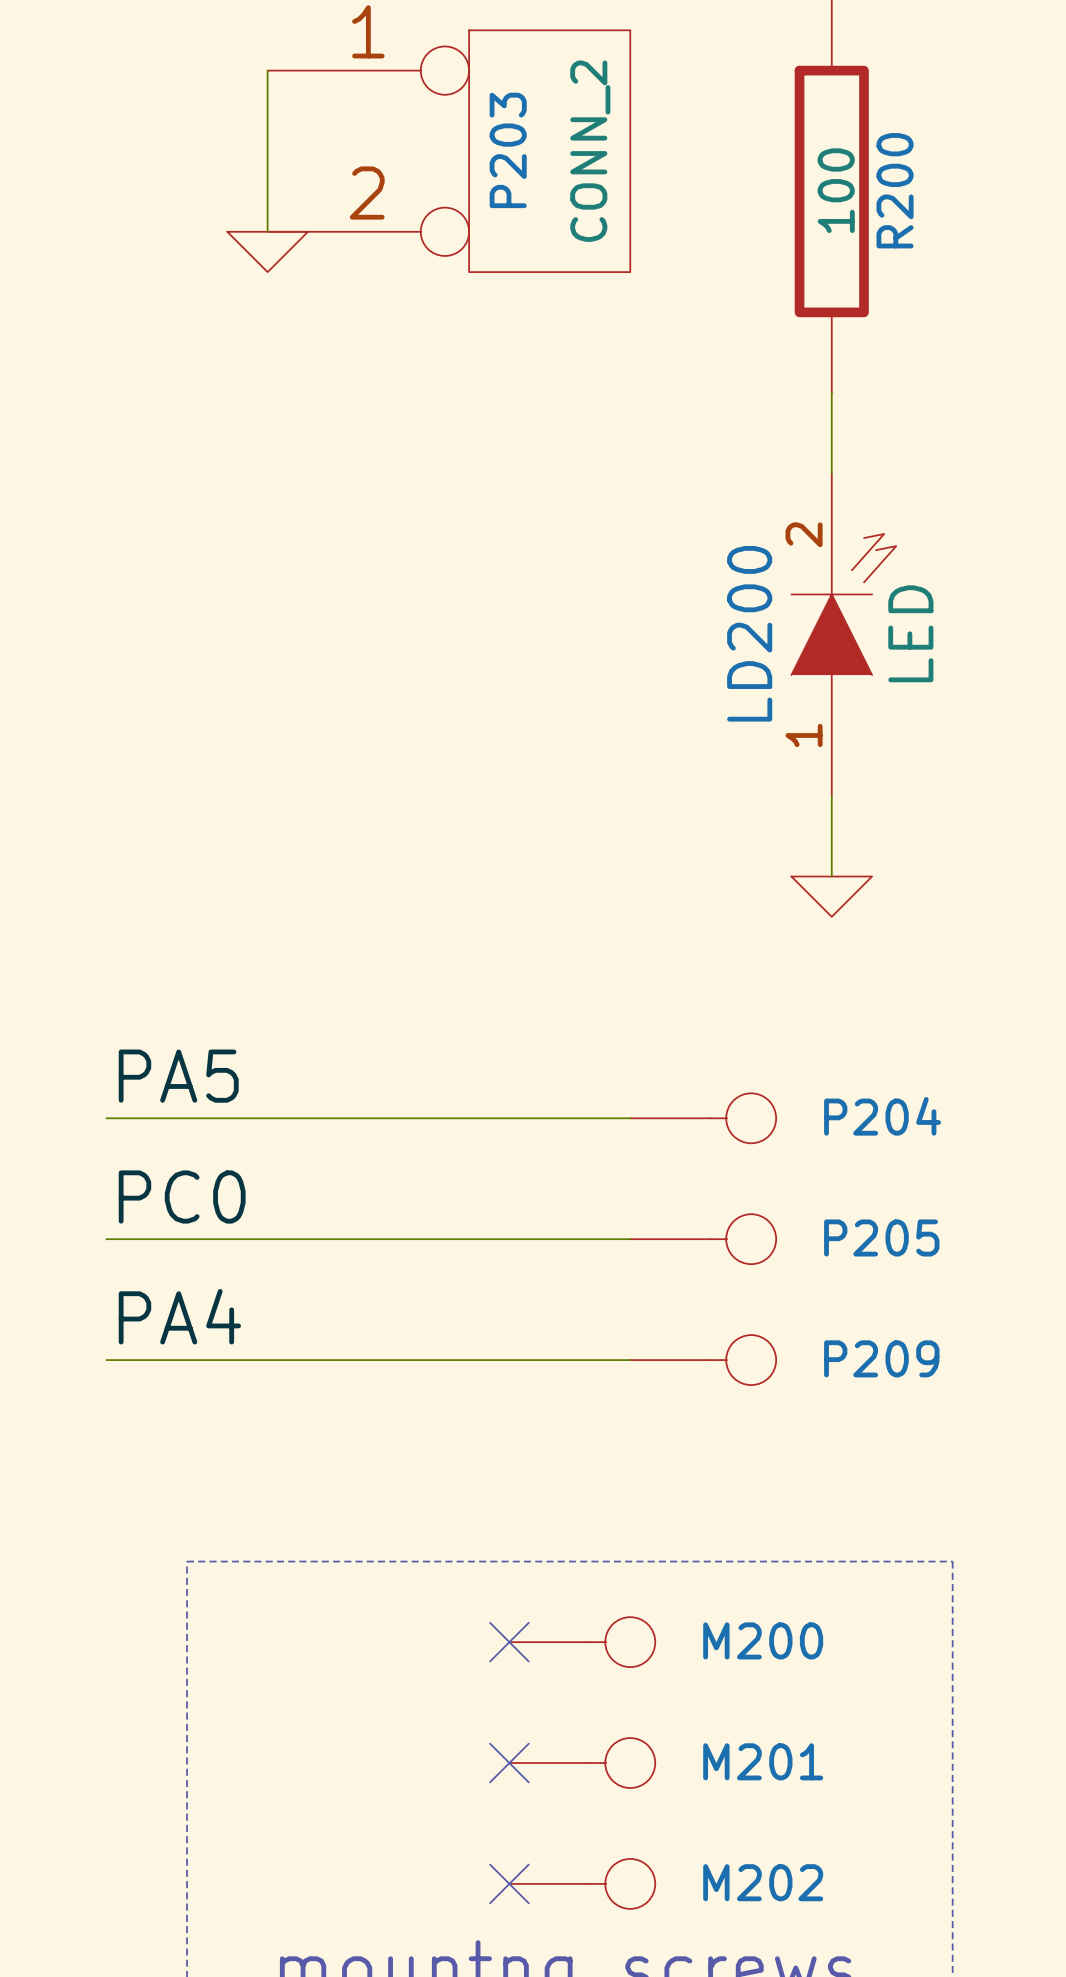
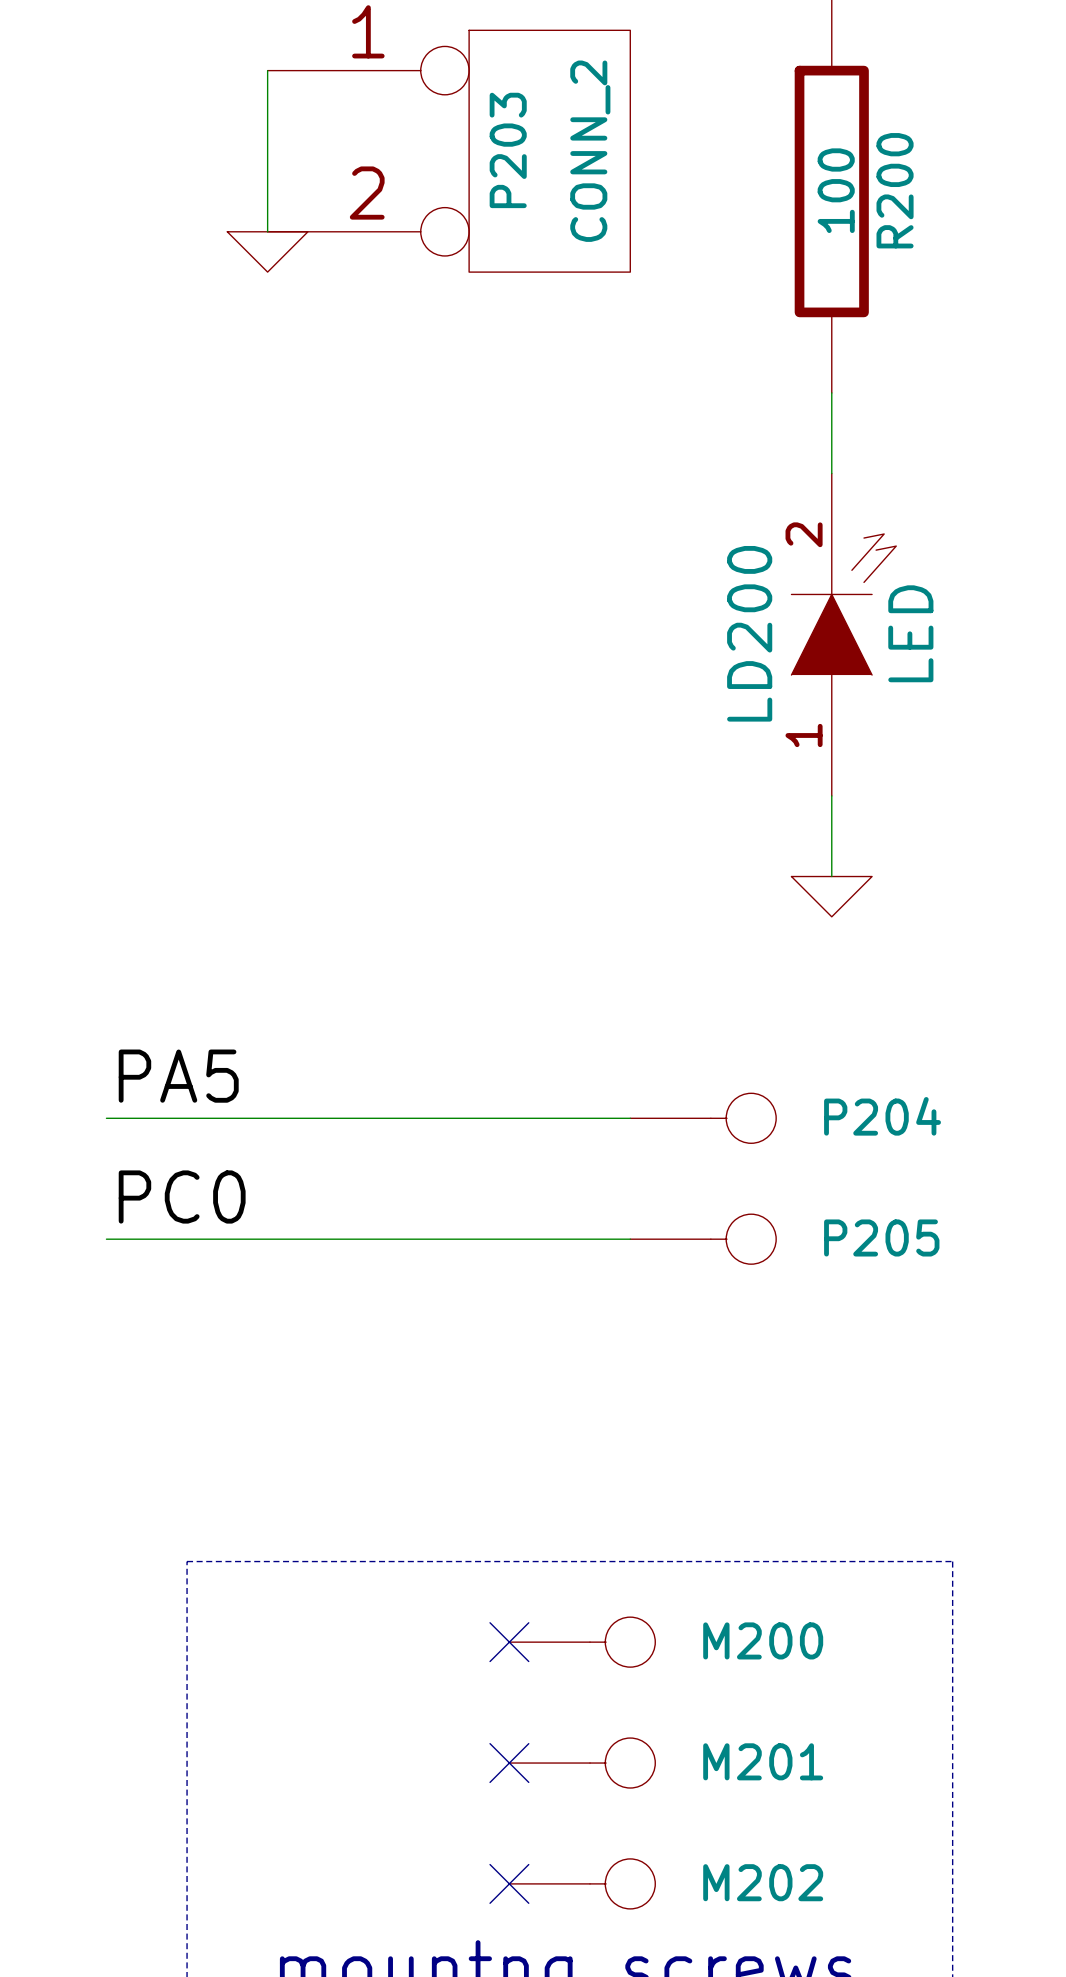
label: PA4 (179, 1316) -> none
wire: (106, 1360) (630, 1360) -> none
P209: (703, 1360) -> none

